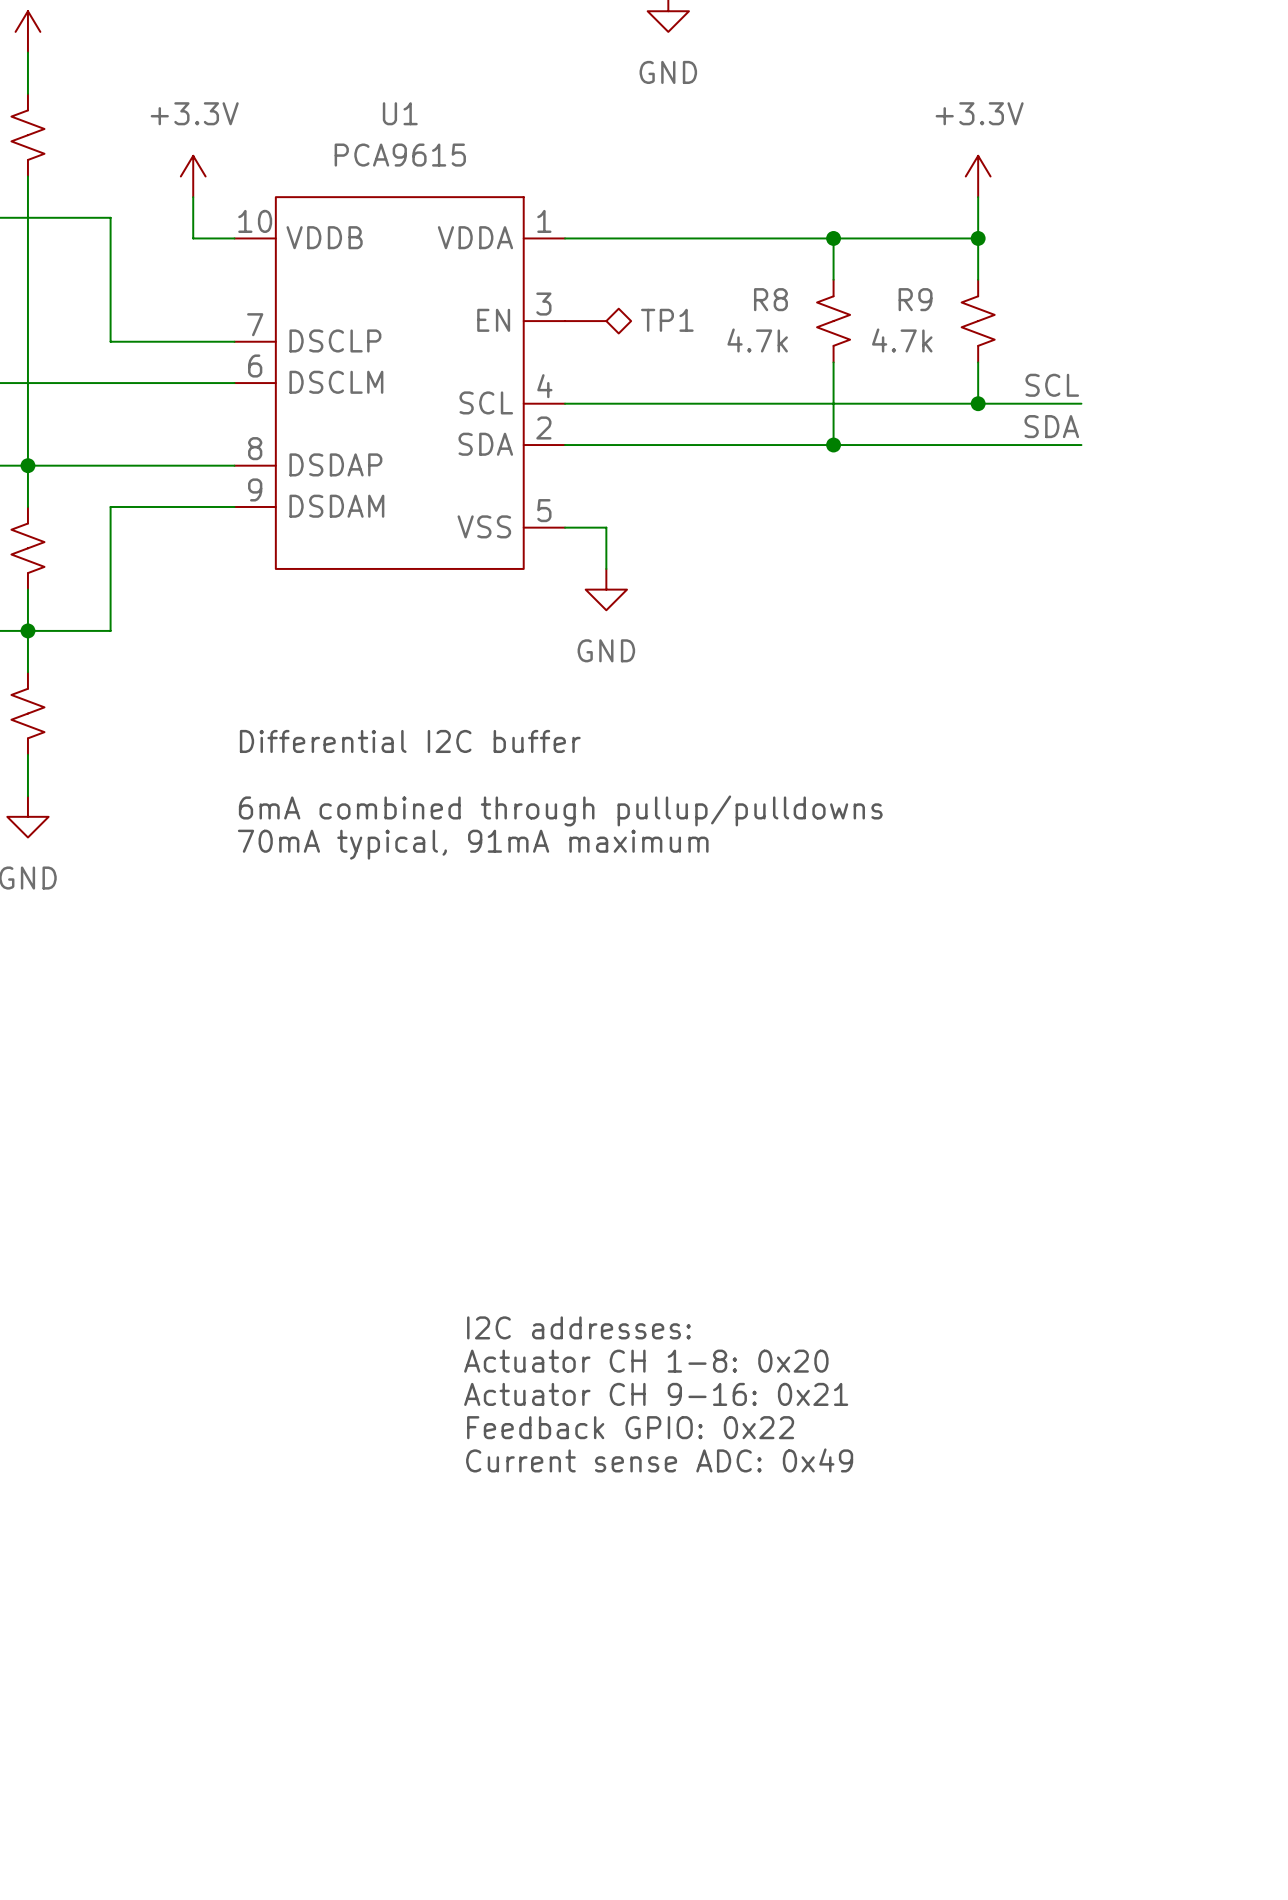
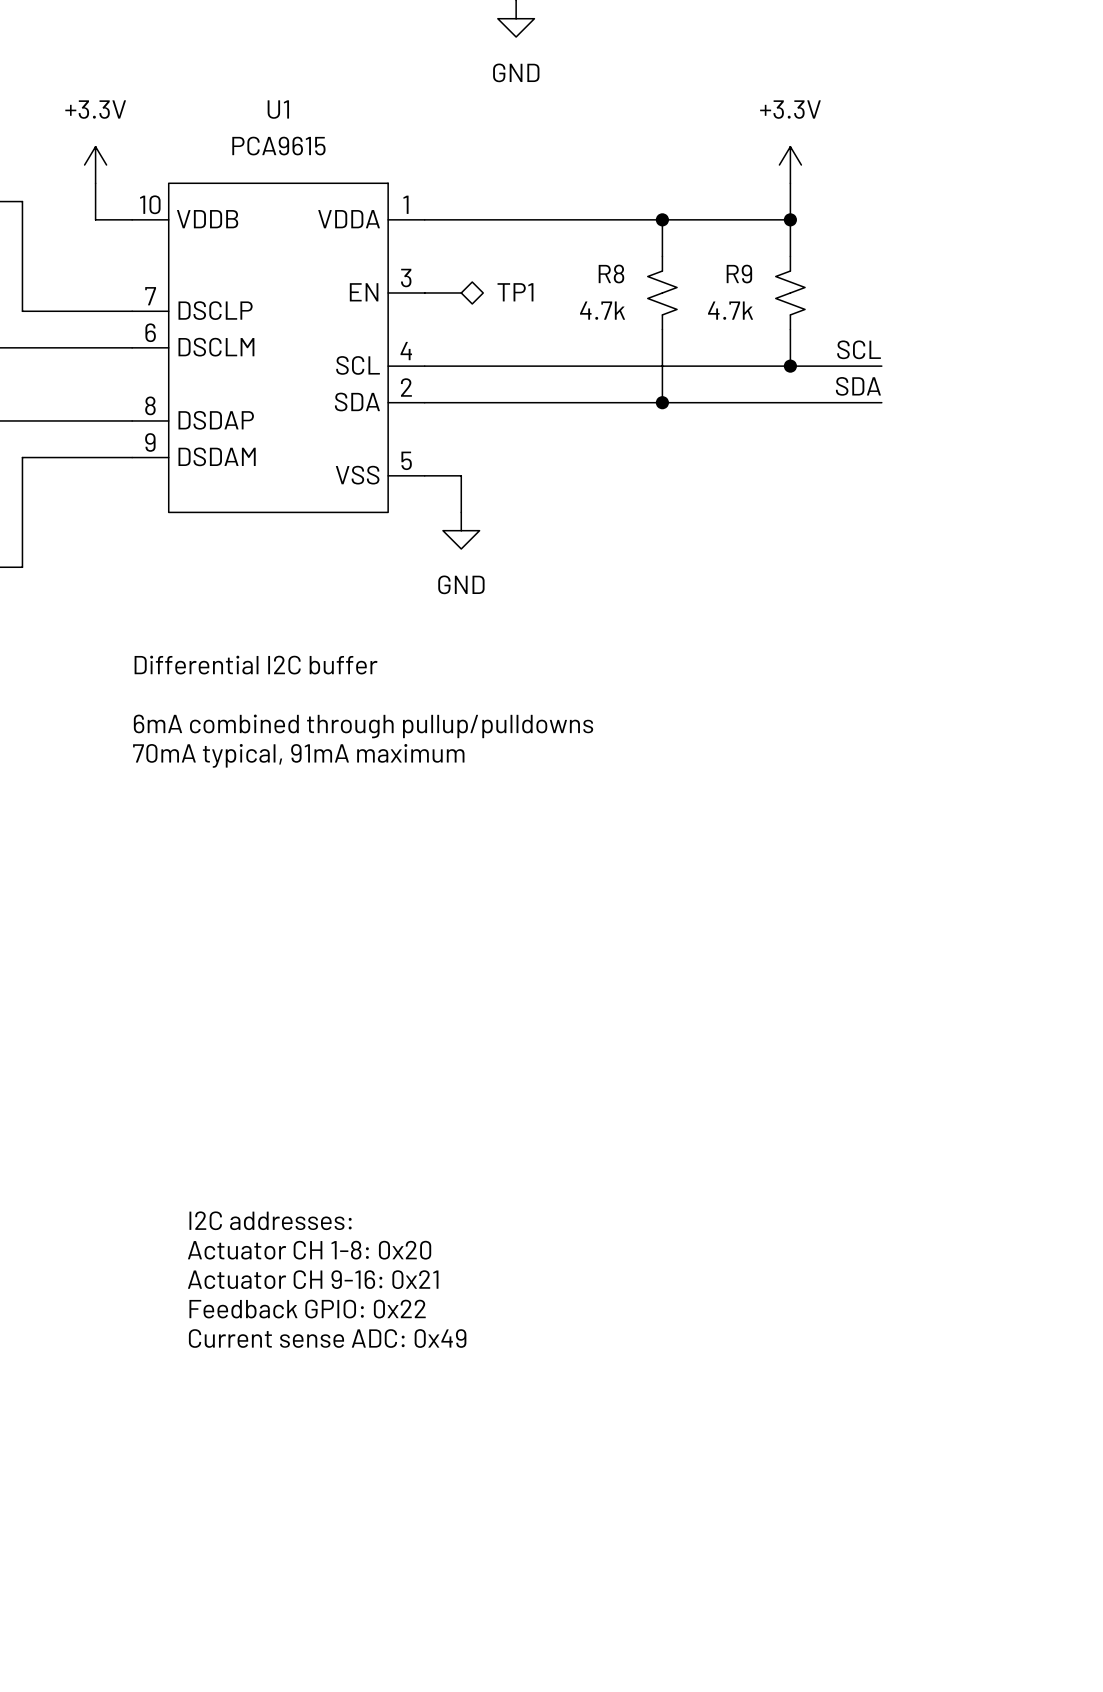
text position: I2C addresses: (578, 1327) -> I2C addresses: (270, 1220)
text position: Actuator CH 1-8: 0x20 (646, 1361) -> Actuator CH 1-8: 0x20 (309, 1250)
text position: Actuator CH 9-16: 0x21 (656, 1394) -> Actuator CH 9-16: 0x21 (313, 1279)
text position: Feedback GPIO: 0x22 (630, 1427) -> Feedback GPIO: 0x22 (307, 1309)
text position: Current sense ADC: 0x49 (659, 1460) -> Current sense ADC: 0x49 (327, 1338)

